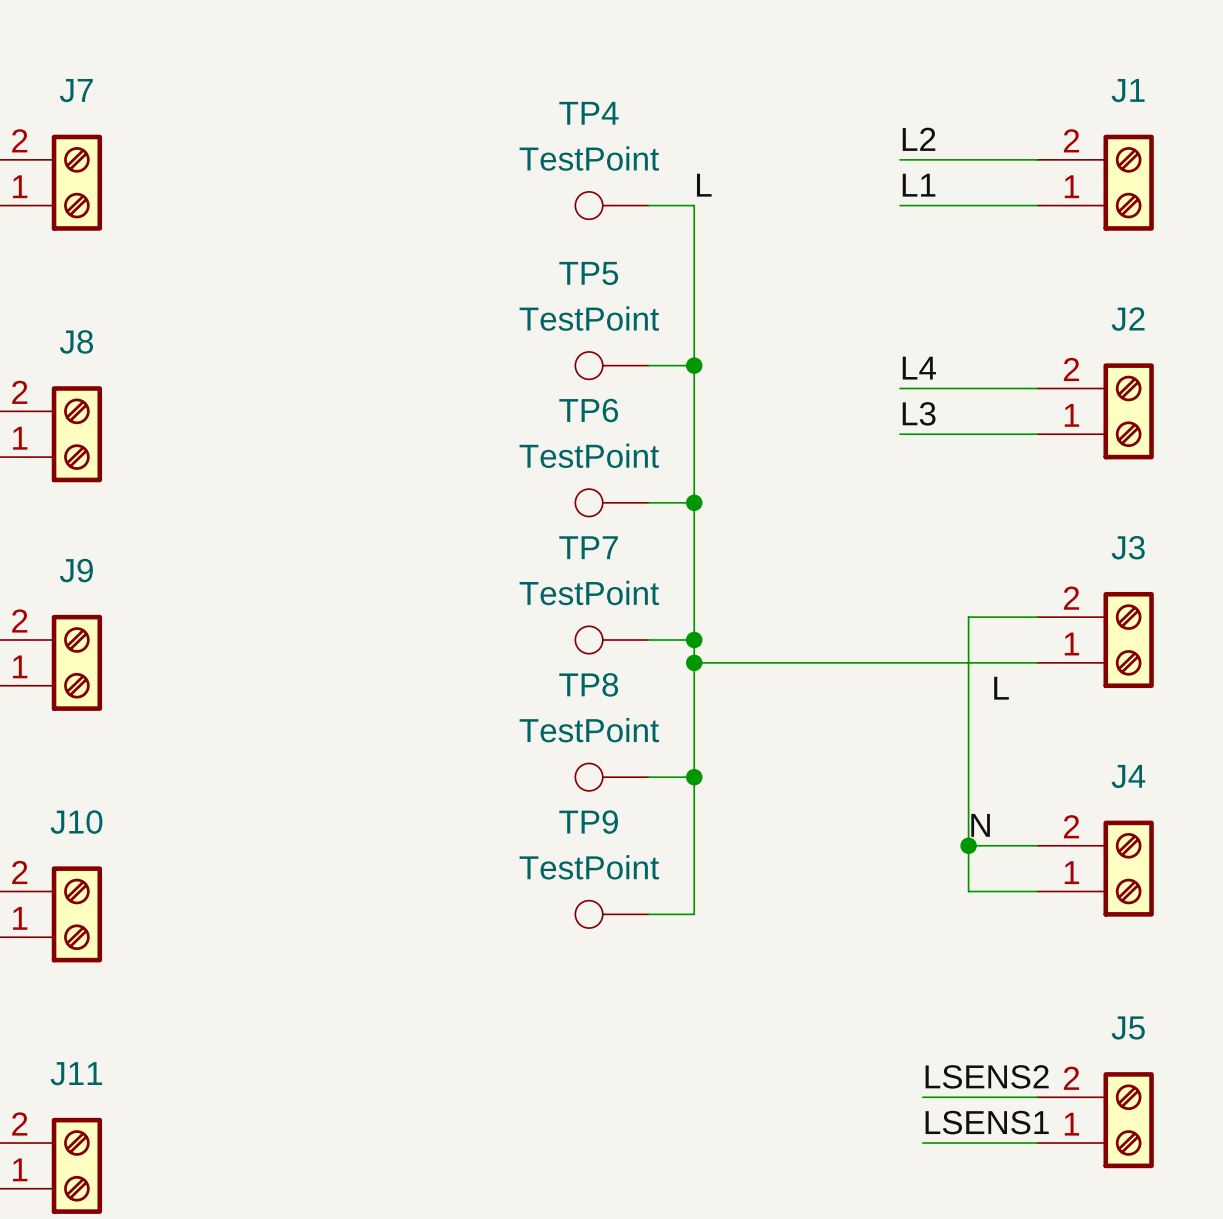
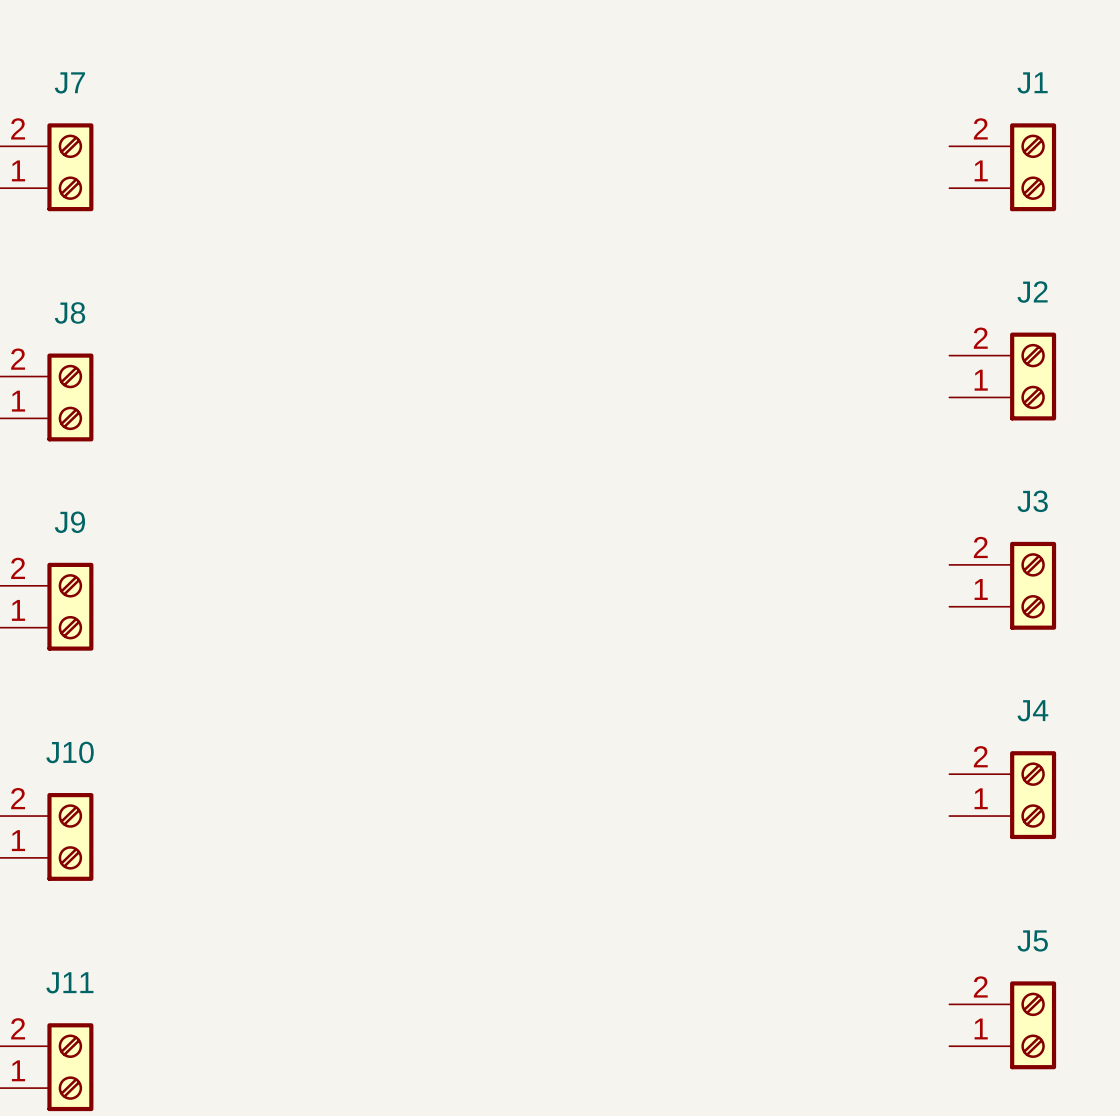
label: L2 (919, 139) -> none
wire: (900, 159) (1037, 159) -> none
label: L (704, 185) -> none
label: L1 (919, 185) -> none
TP4: TestPoint (611, 205) -> none
wire: (648, 205) (694, 205) (694, 914) (648, 914) -> none
wire: (900, 205) (1037, 205) -> none
TP5: TestPoint (611, 365) -> none
wire: (648, 365) (694, 365) -> none
junction: (694, 365) -> none
label: L4 (919, 368) -> none
wire: (900, 388) (1037, 388) -> none
label: L3 (919, 413) -> none
wire: (900, 434) (1037, 434) -> none
TP6: TestPoint (611, 502) -> none
wire: (648, 502) (694, 502) -> none
junction: (694, 502) -> none
wire: (1037, 617) (968, 617) (968, 891) (1037, 891) -> none
TP7: TestPoint (611, 640) -> none
wire: (648, 640) (694, 640) -> none
junction: (694, 640) -> none
wire: (694, 662) (1037, 662) -> none
junction: (694, 662) -> none
label: L (1001, 688) -> none
TP8: TestPoint (611, 777) -> none
wire: (648, 777) (694, 777) -> none
junction: (694, 777) -> none
label: N (980, 825) -> none
wire: (968, 845) (1037, 845) -> none
junction: (968, 845) -> none
TP9: TestPoint (611, 914) -> none
label: LSENS2 (987, 1076) -> none
wire: (922, 1097) (1037, 1097) -> none
label: LSENS1 (987, 1122) -> none
wire: (922, 1143) (1037, 1143) -> none

